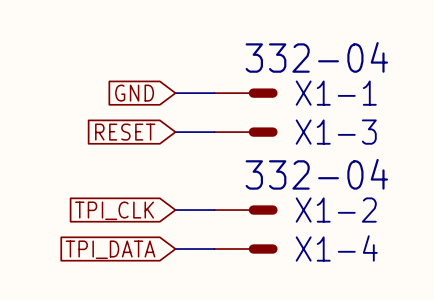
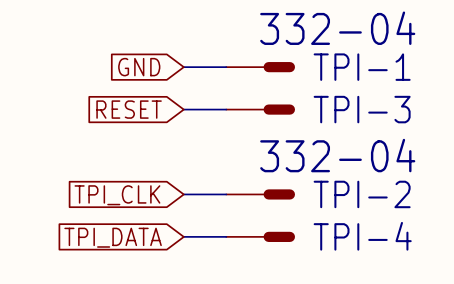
X1-1 name: X1-1 (336, 93) -> TPI-1 (362, 67)
X1-3 name: X1-3 (336, 132) -> TPI-3 (362, 109)
X1-2 name: X1-2 (336, 210) -> TPI-2 (362, 194)
X1-4 name: X1-4 (336, 248) -> TPI-4 (362, 236)

